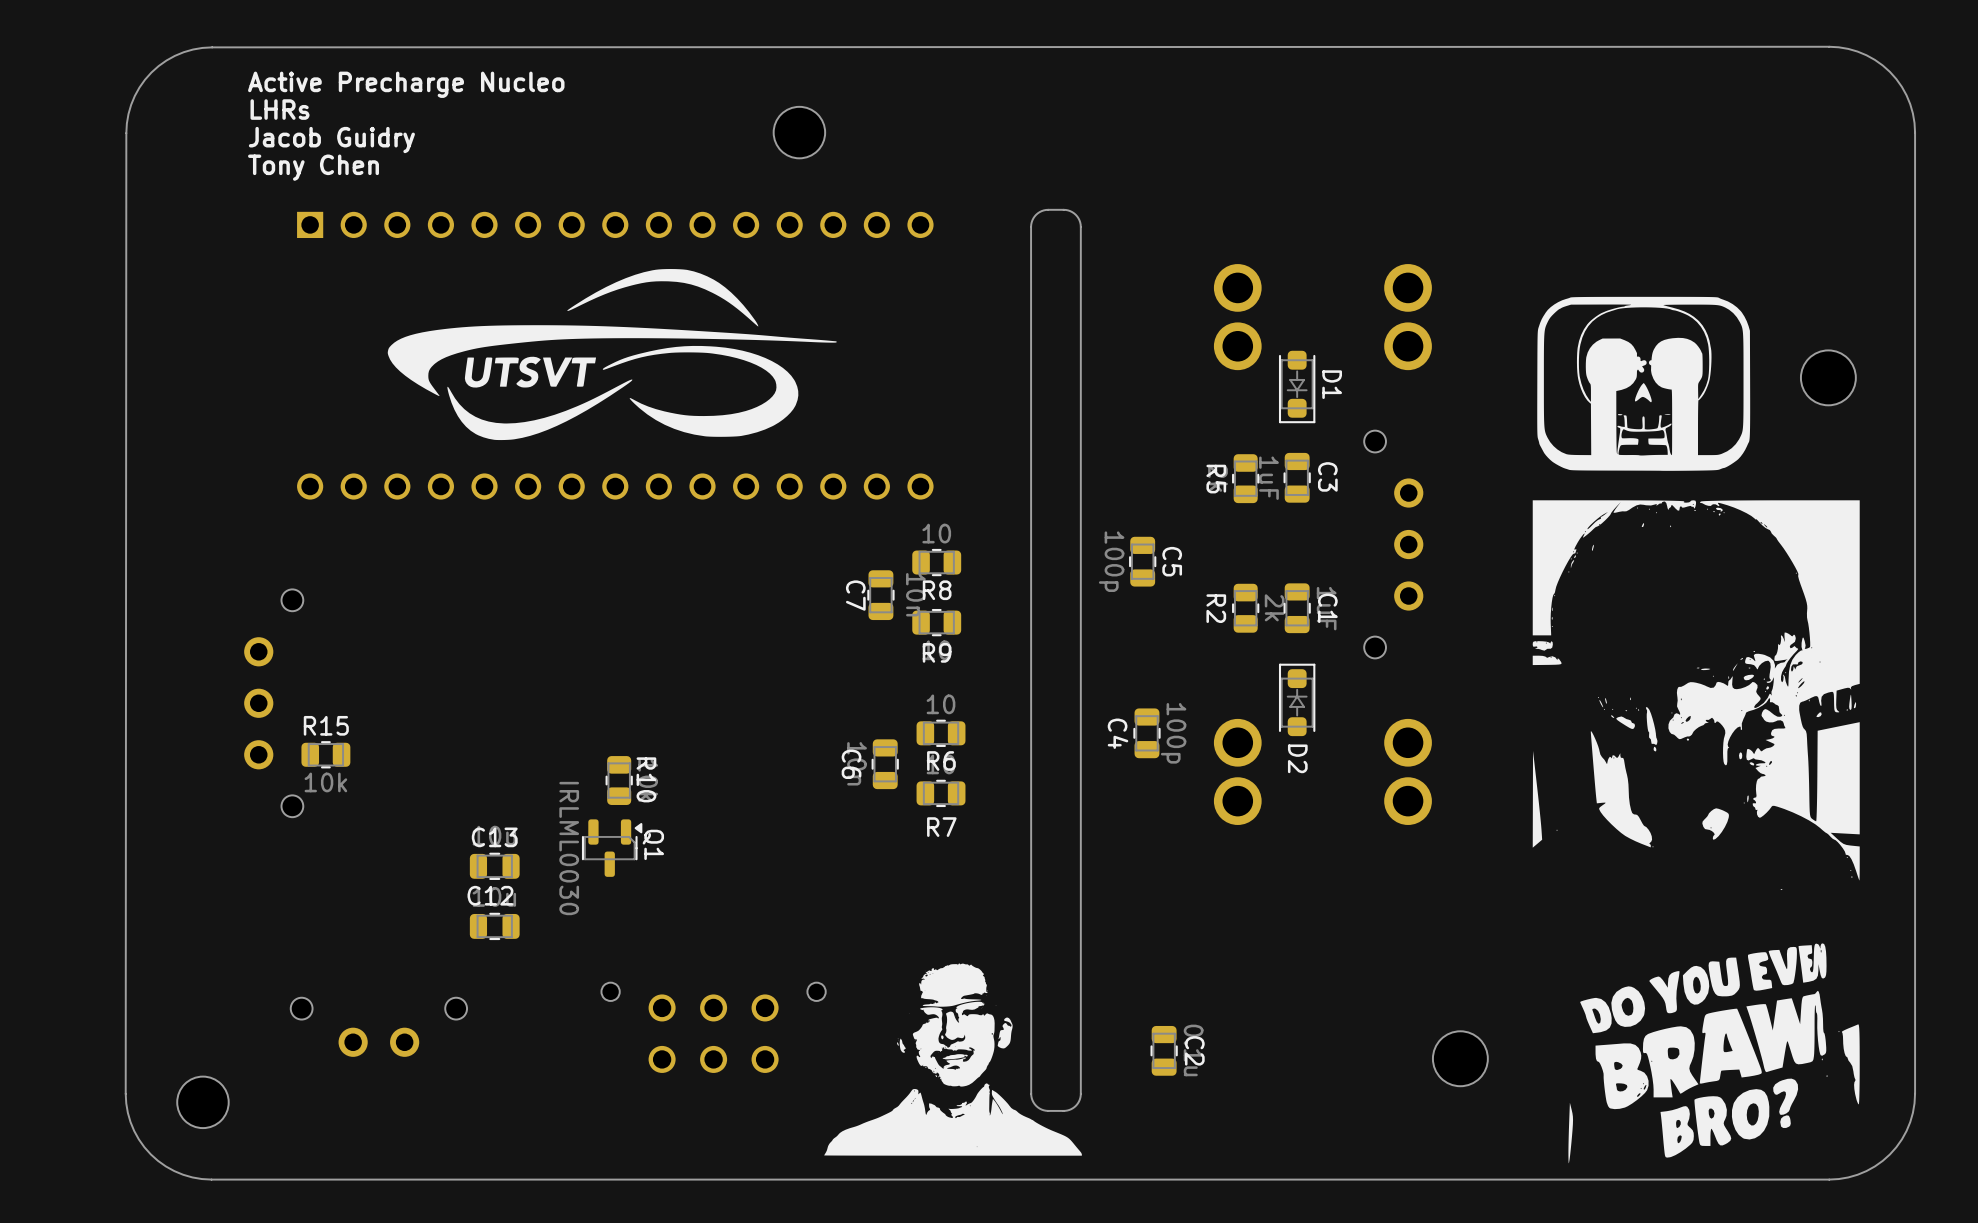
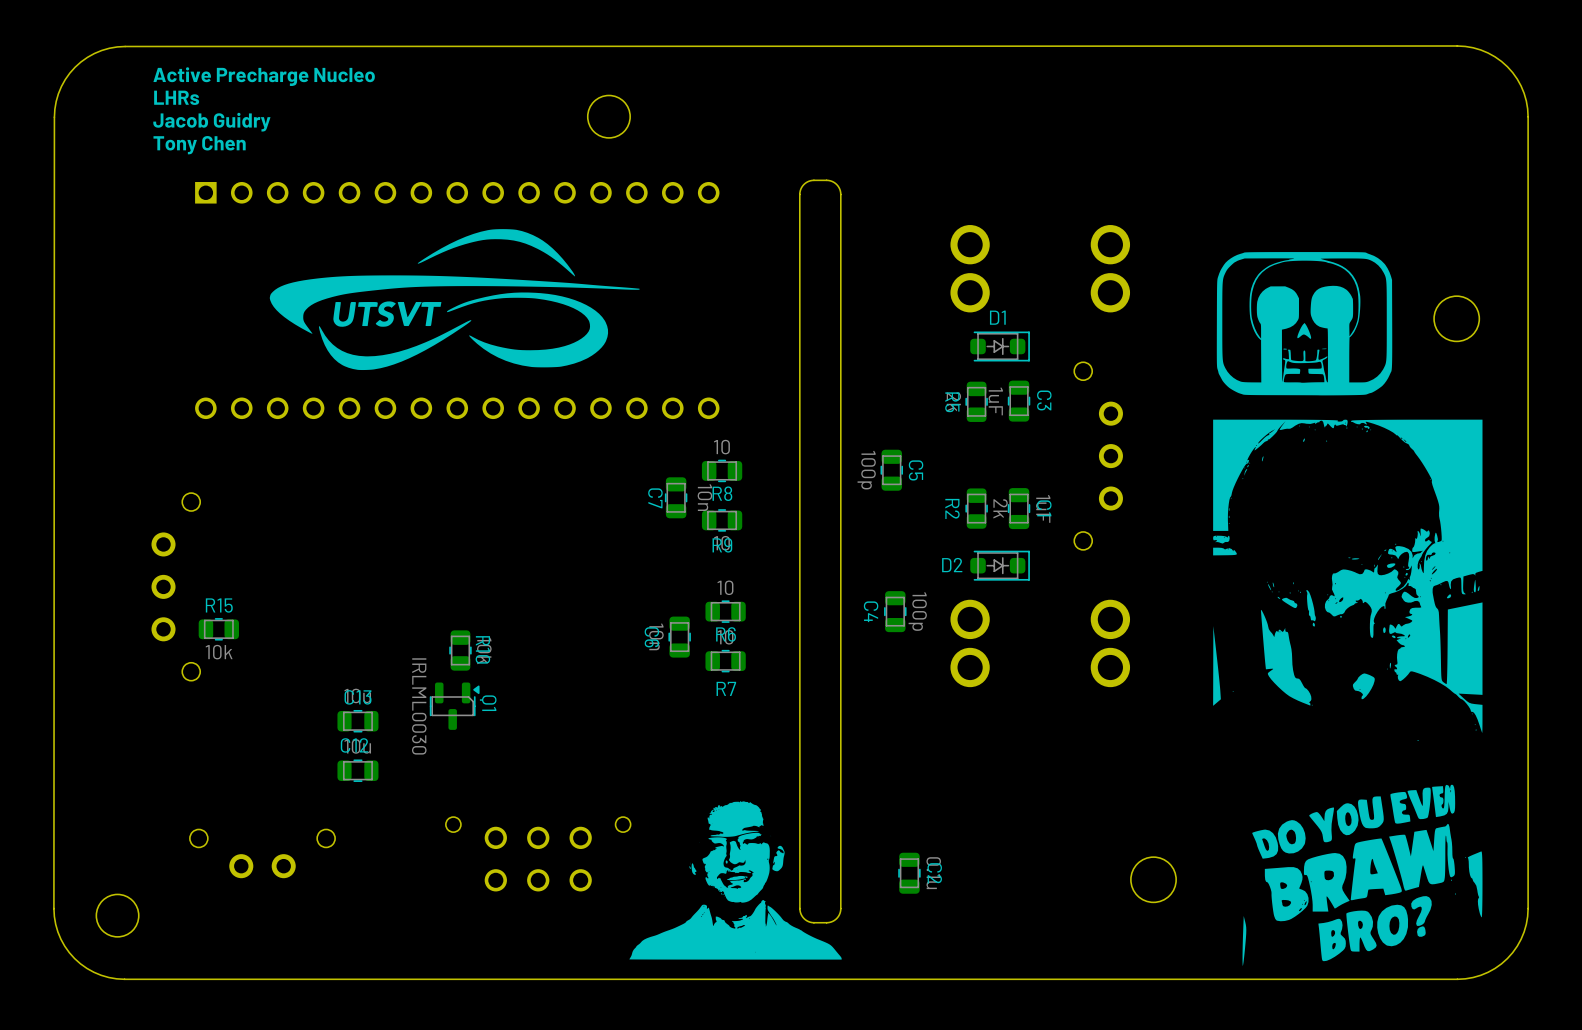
drawing: none -> [1216, 252, 1393, 396]
part: (1643, 383) -> none
D1 rotation: 0° (1297, 386) -> 90° counterclockwise (1000, 346)
D2 rotation: 0° (1297, 699) -> 90° clockwise (1000, 565)

